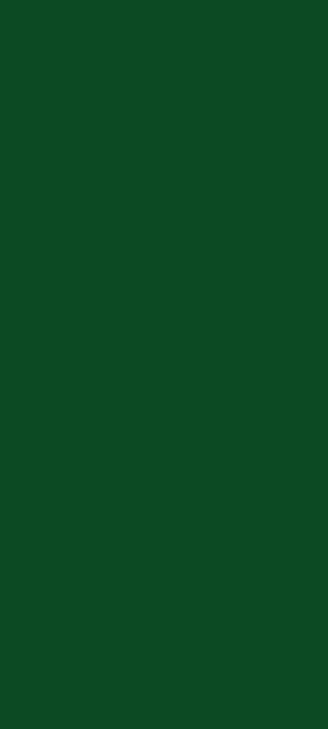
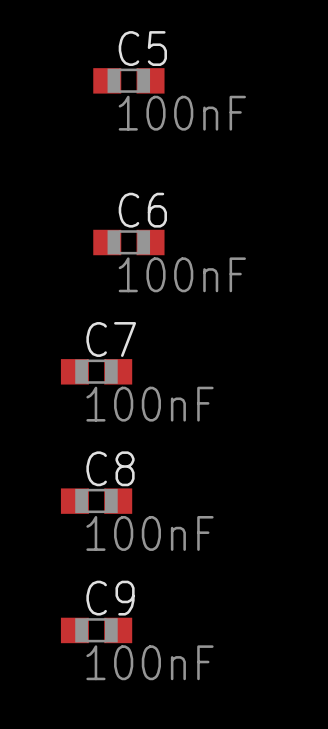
C5: none -> 100nF (128, 80)
C6: none -> 100nF (128, 242)
C7: none -> 100nF (96, 371)
C8: none -> 100nF (96, 501)
C9: none -> 100nF (96, 630)

